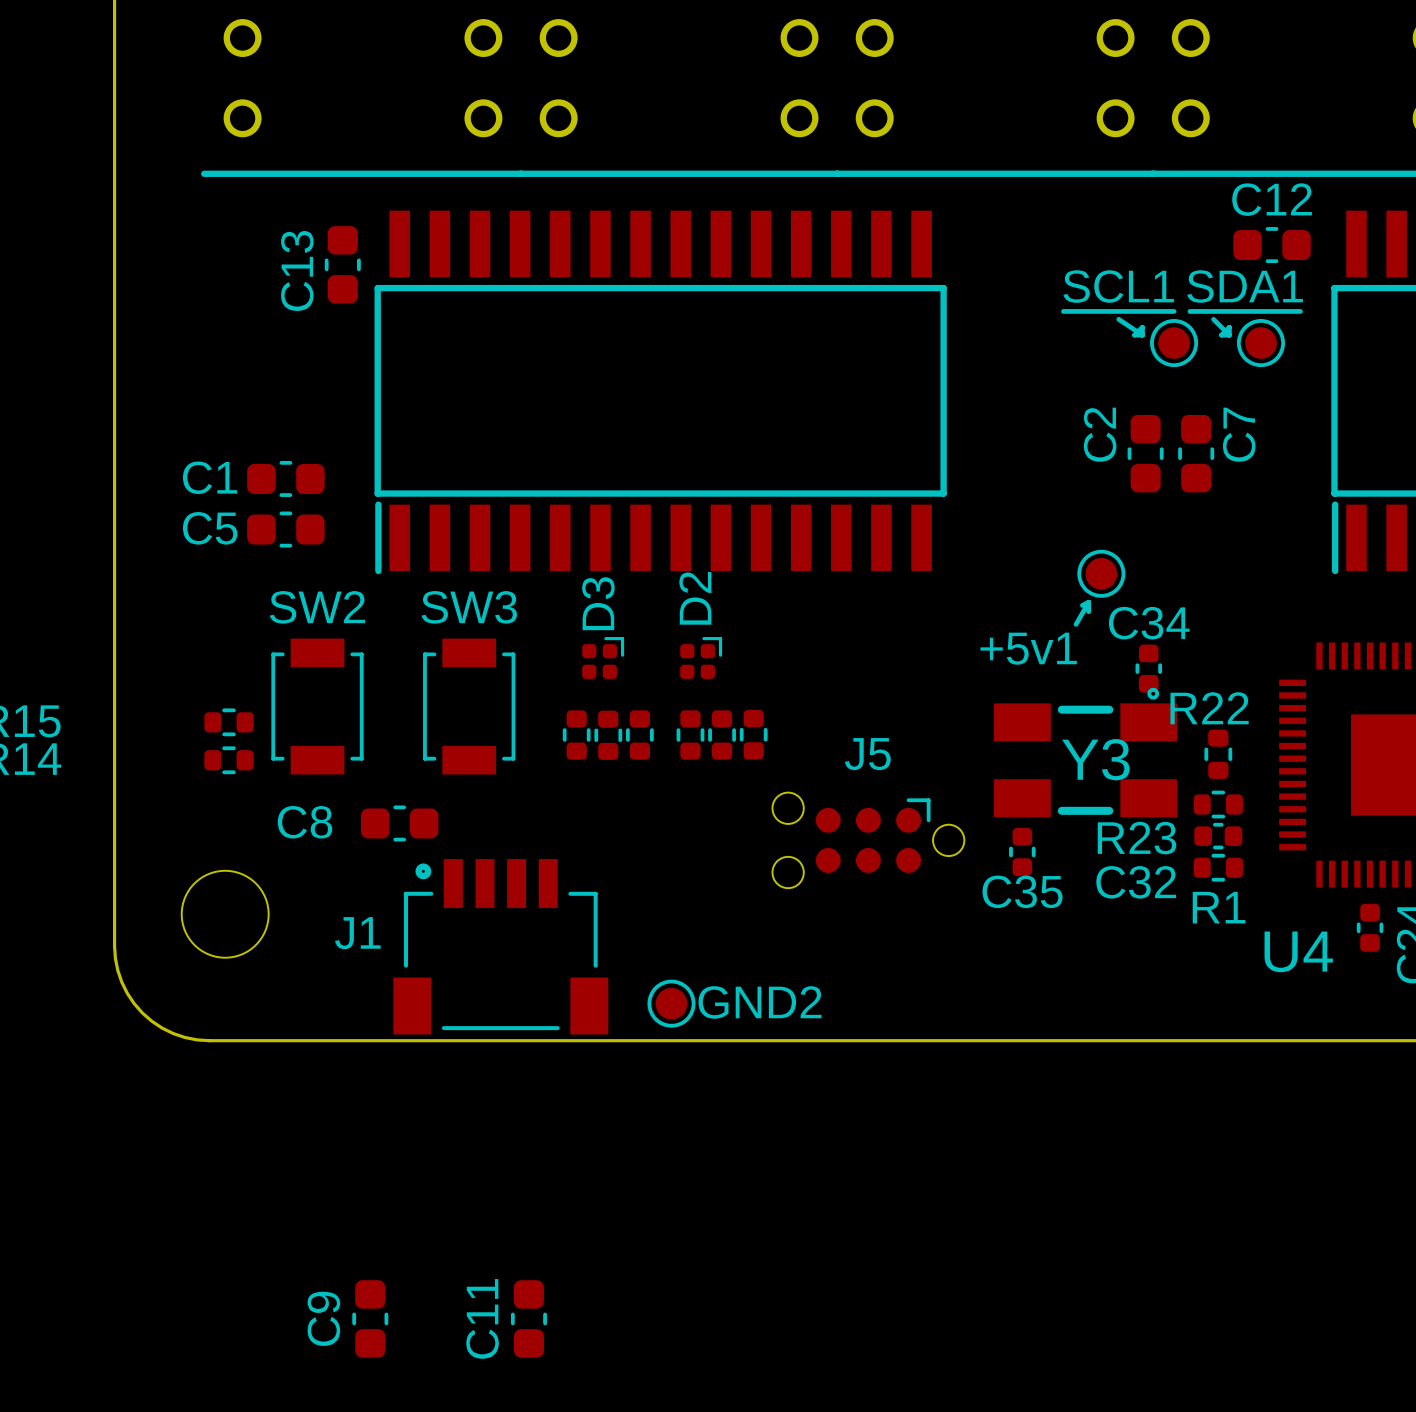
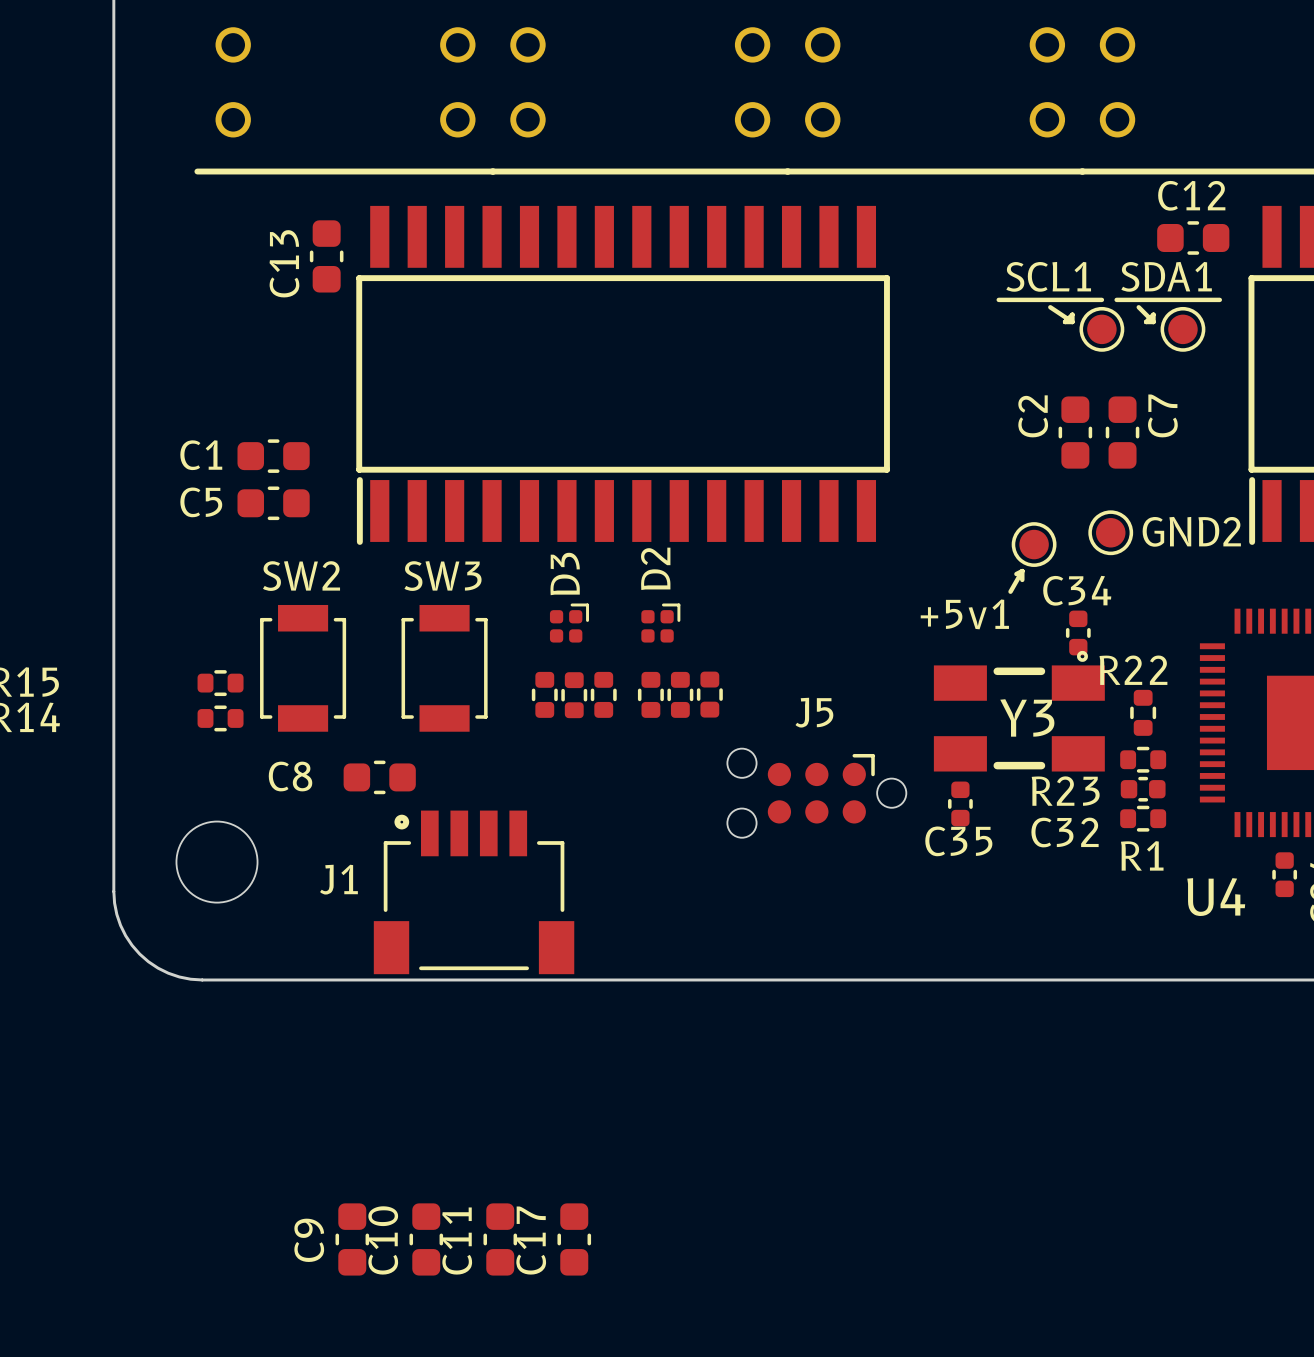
GND2 position: (671, 1003) -> (1110, 532)
C10: none -> (426, 1239)
C17: none -> (574, 1239)

